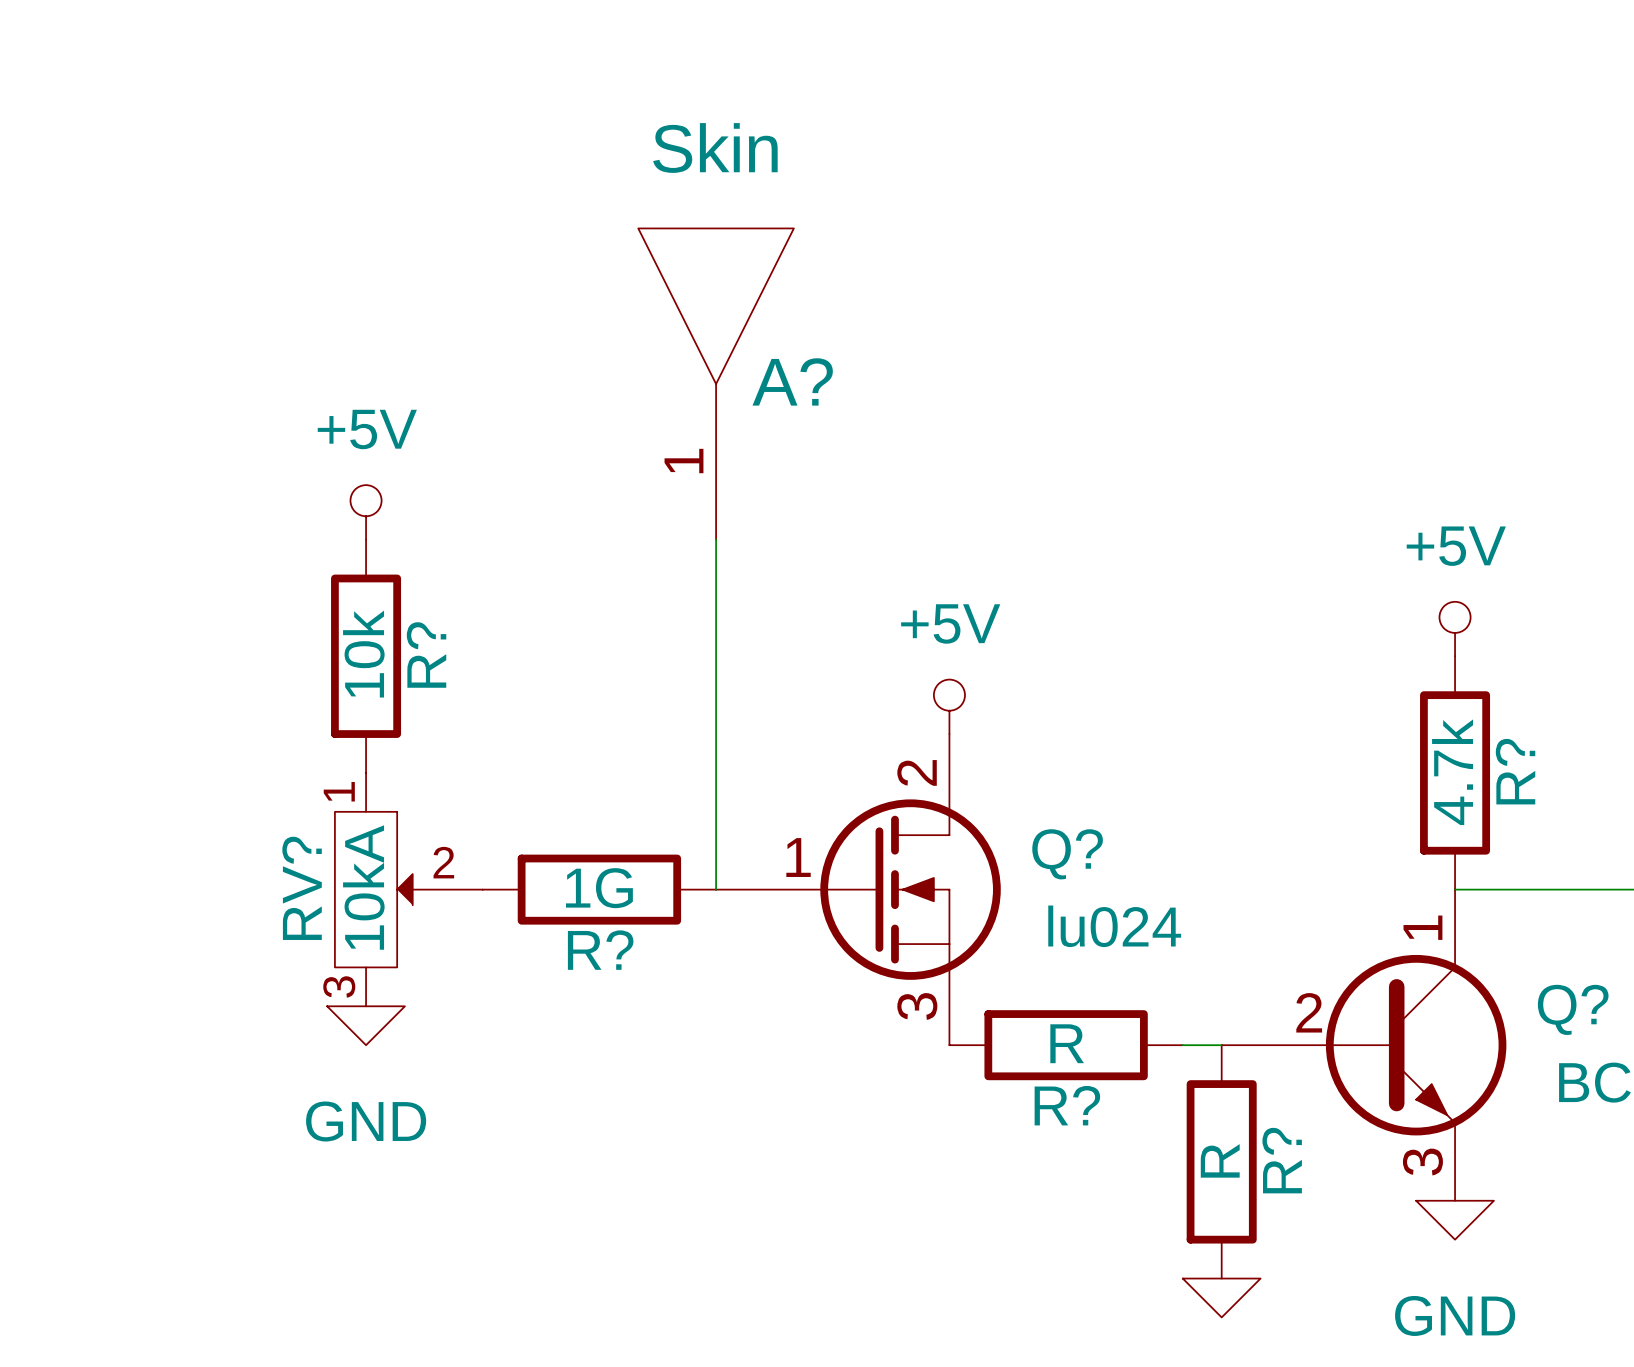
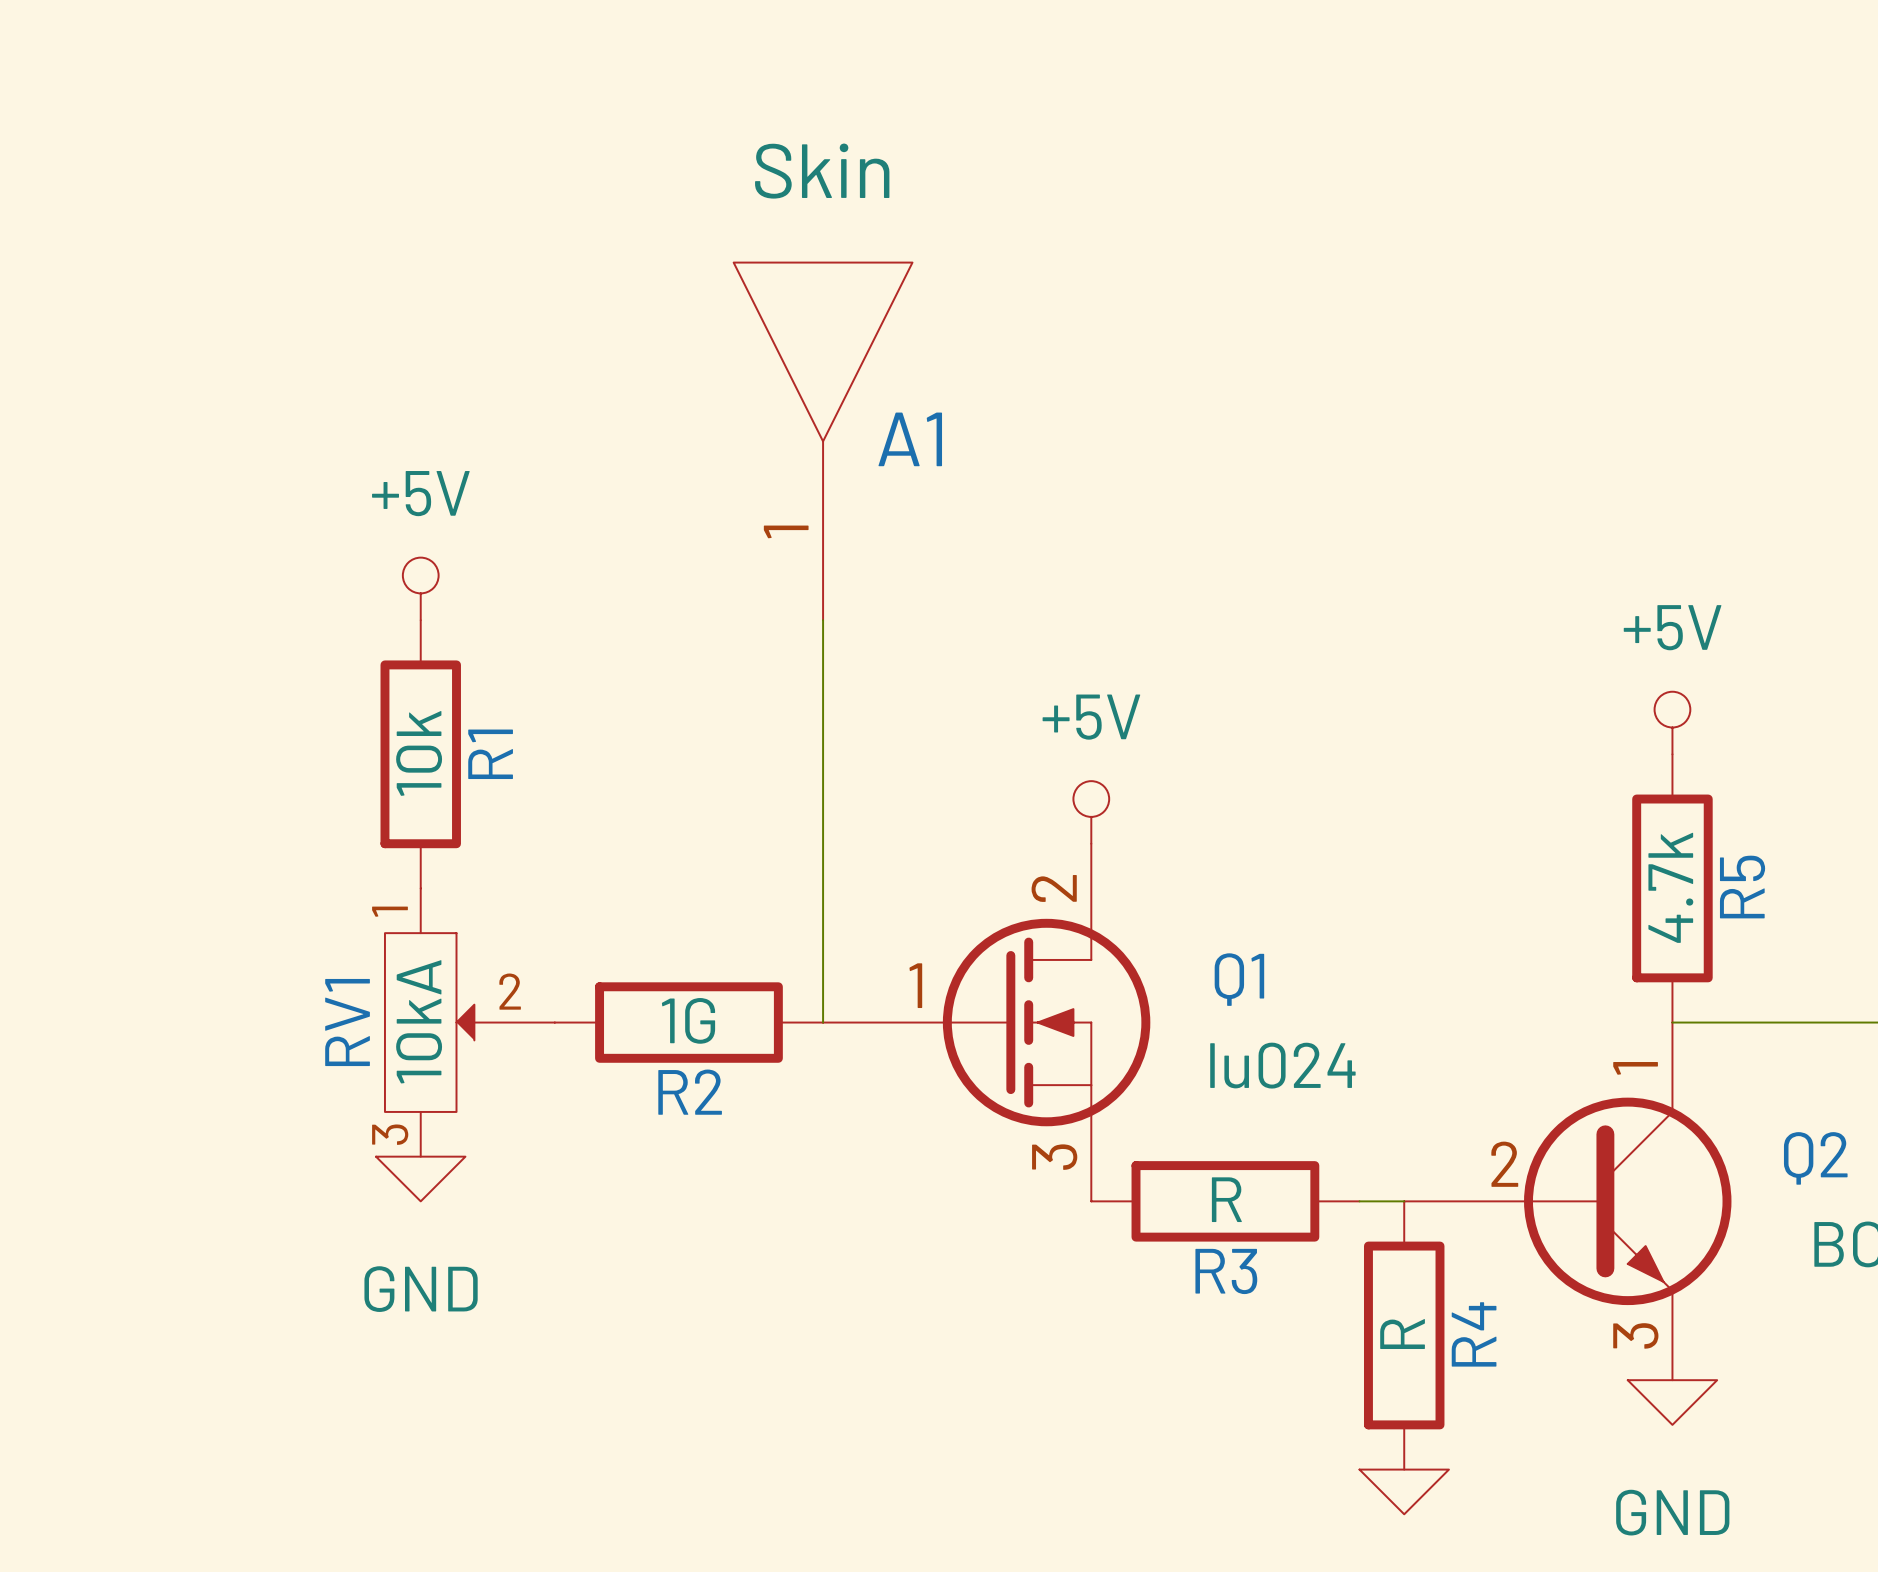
A? name: A? (792, 381) -> A1 (910, 439)
R? name: R? (426, 654) -> R1 (490, 754)
R? name: R? (1515, 771) -> R5 (1742, 887)
Q? name: Q? (1067, 854) -> Q1 (1239, 979)
RV? name: RV? (302, 888) -> RV1 (347, 1022)
R? name: R? (600, 950) -> R2 (690, 1092)
Q? name: Q? (1573, 1009) -> Q2 (1815, 1158)
R? name: R? (1067, 1105) -> R3 (1226, 1271)
R? name: R? (1282, 1160) -> R4 (1474, 1334)

